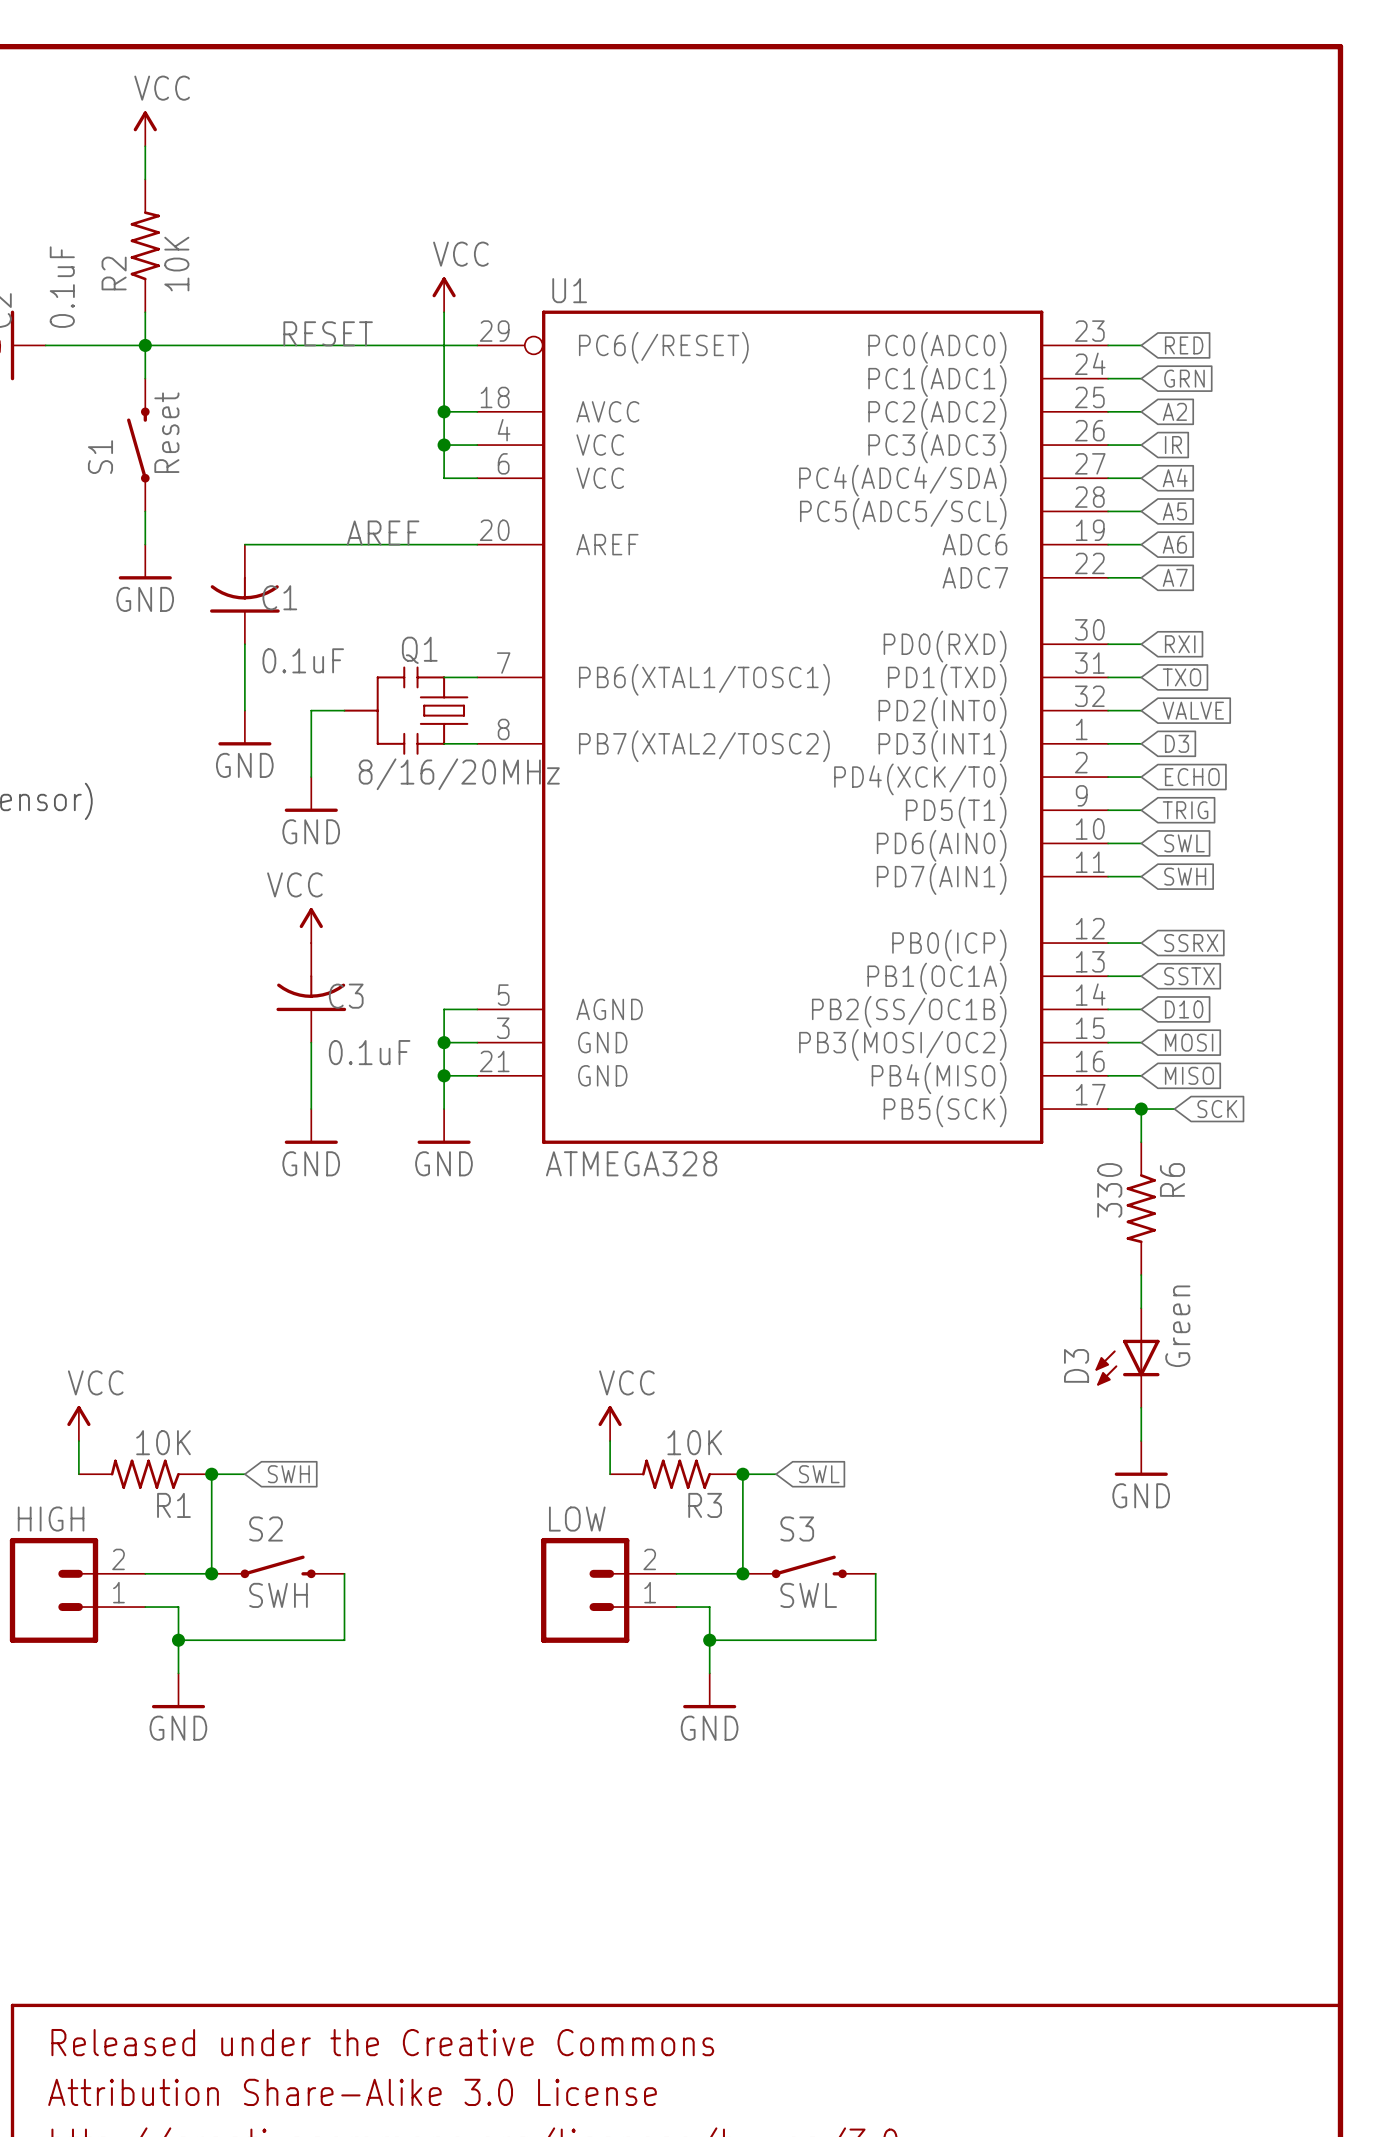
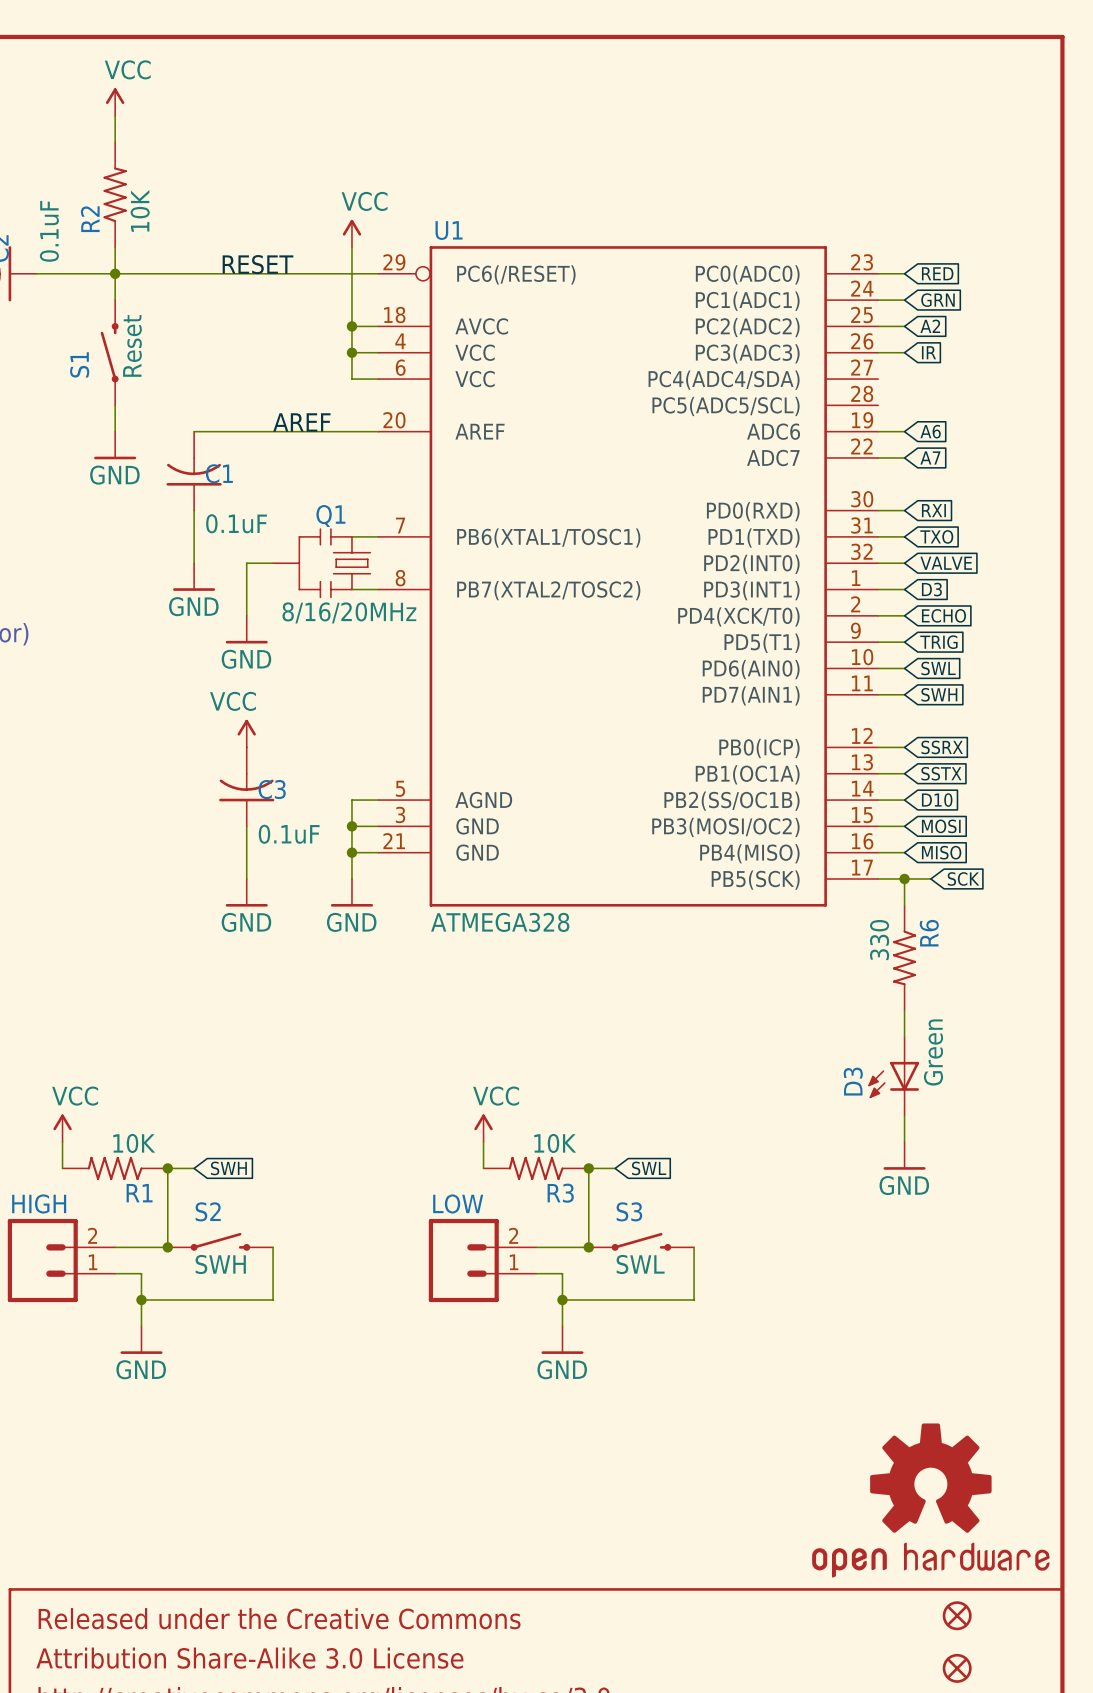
global label: A4 (1175, 477) -> none
wire: (1108, 478) (1141, 478) -> none
wire: (1108, 511) (1141, 511) -> none
global label: A5 (1174, 511) -> none
part: none -> (930, 1500)
part: none -> (957, 1615)
part: none -> (957, 1668)

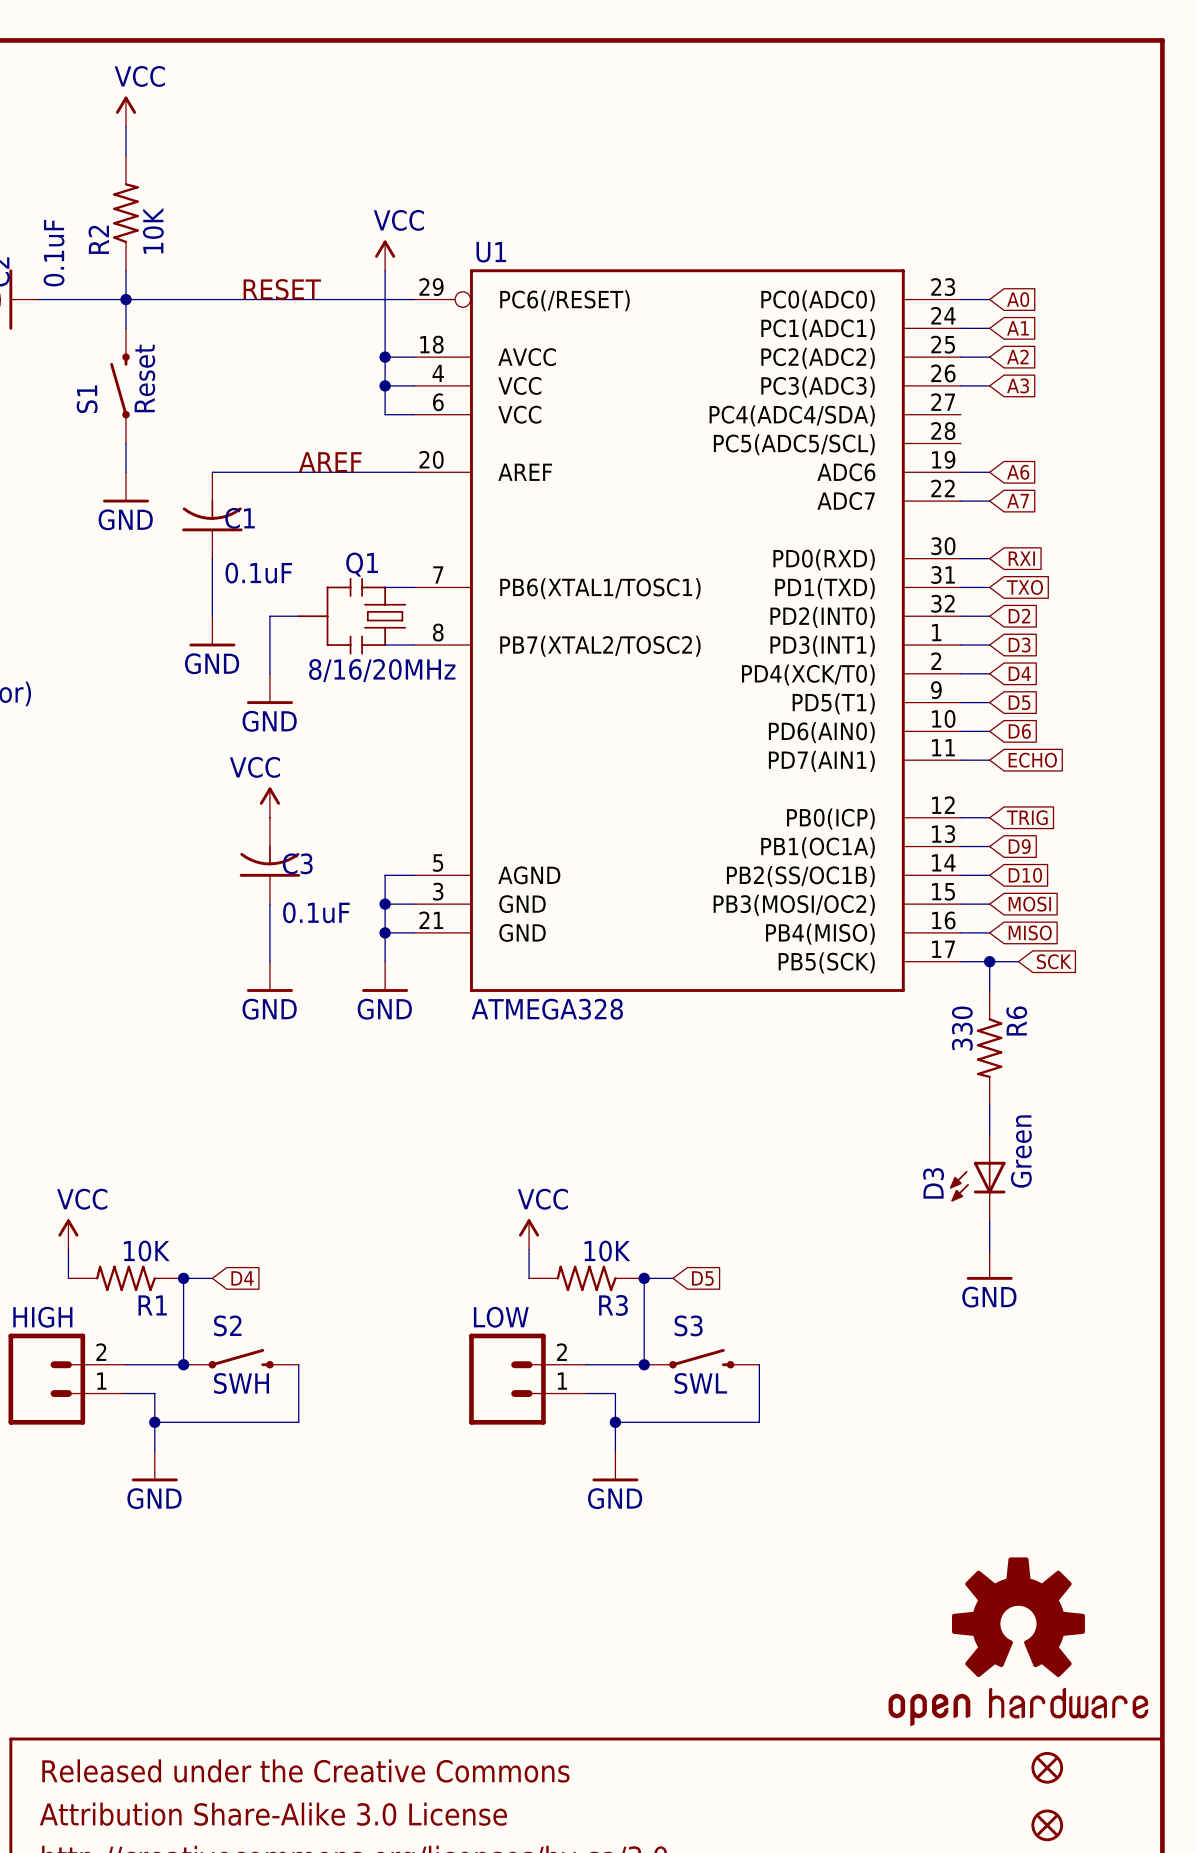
global label: RED (937, 273) -> A0 (1018, 299)
global label: GRN (938, 300) -> A1 (1017, 328)
global label: IR (928, 352) -> A3 (1018, 385)
global label: VALVE (946, 563) -> D2 (1019, 616)
global label: ECHO (943, 615) -> D4 (1019, 673)
global label: TRIG (938, 642) -> D5 (1019, 702)
global label: SWL (938, 668) -> D6 (1019, 731)
global label: SWH (939, 694) -> ECHO (1032, 760)
global label: SSRX (942, 747) -> TRIG (1027, 817)
global label: SSTX (941, 773) -> D9 (1019, 846)
global label: SWH (228, 1168) -> D4 (242, 1278)
global label: SWL (649, 1168) -> D5 (702, 1278)

